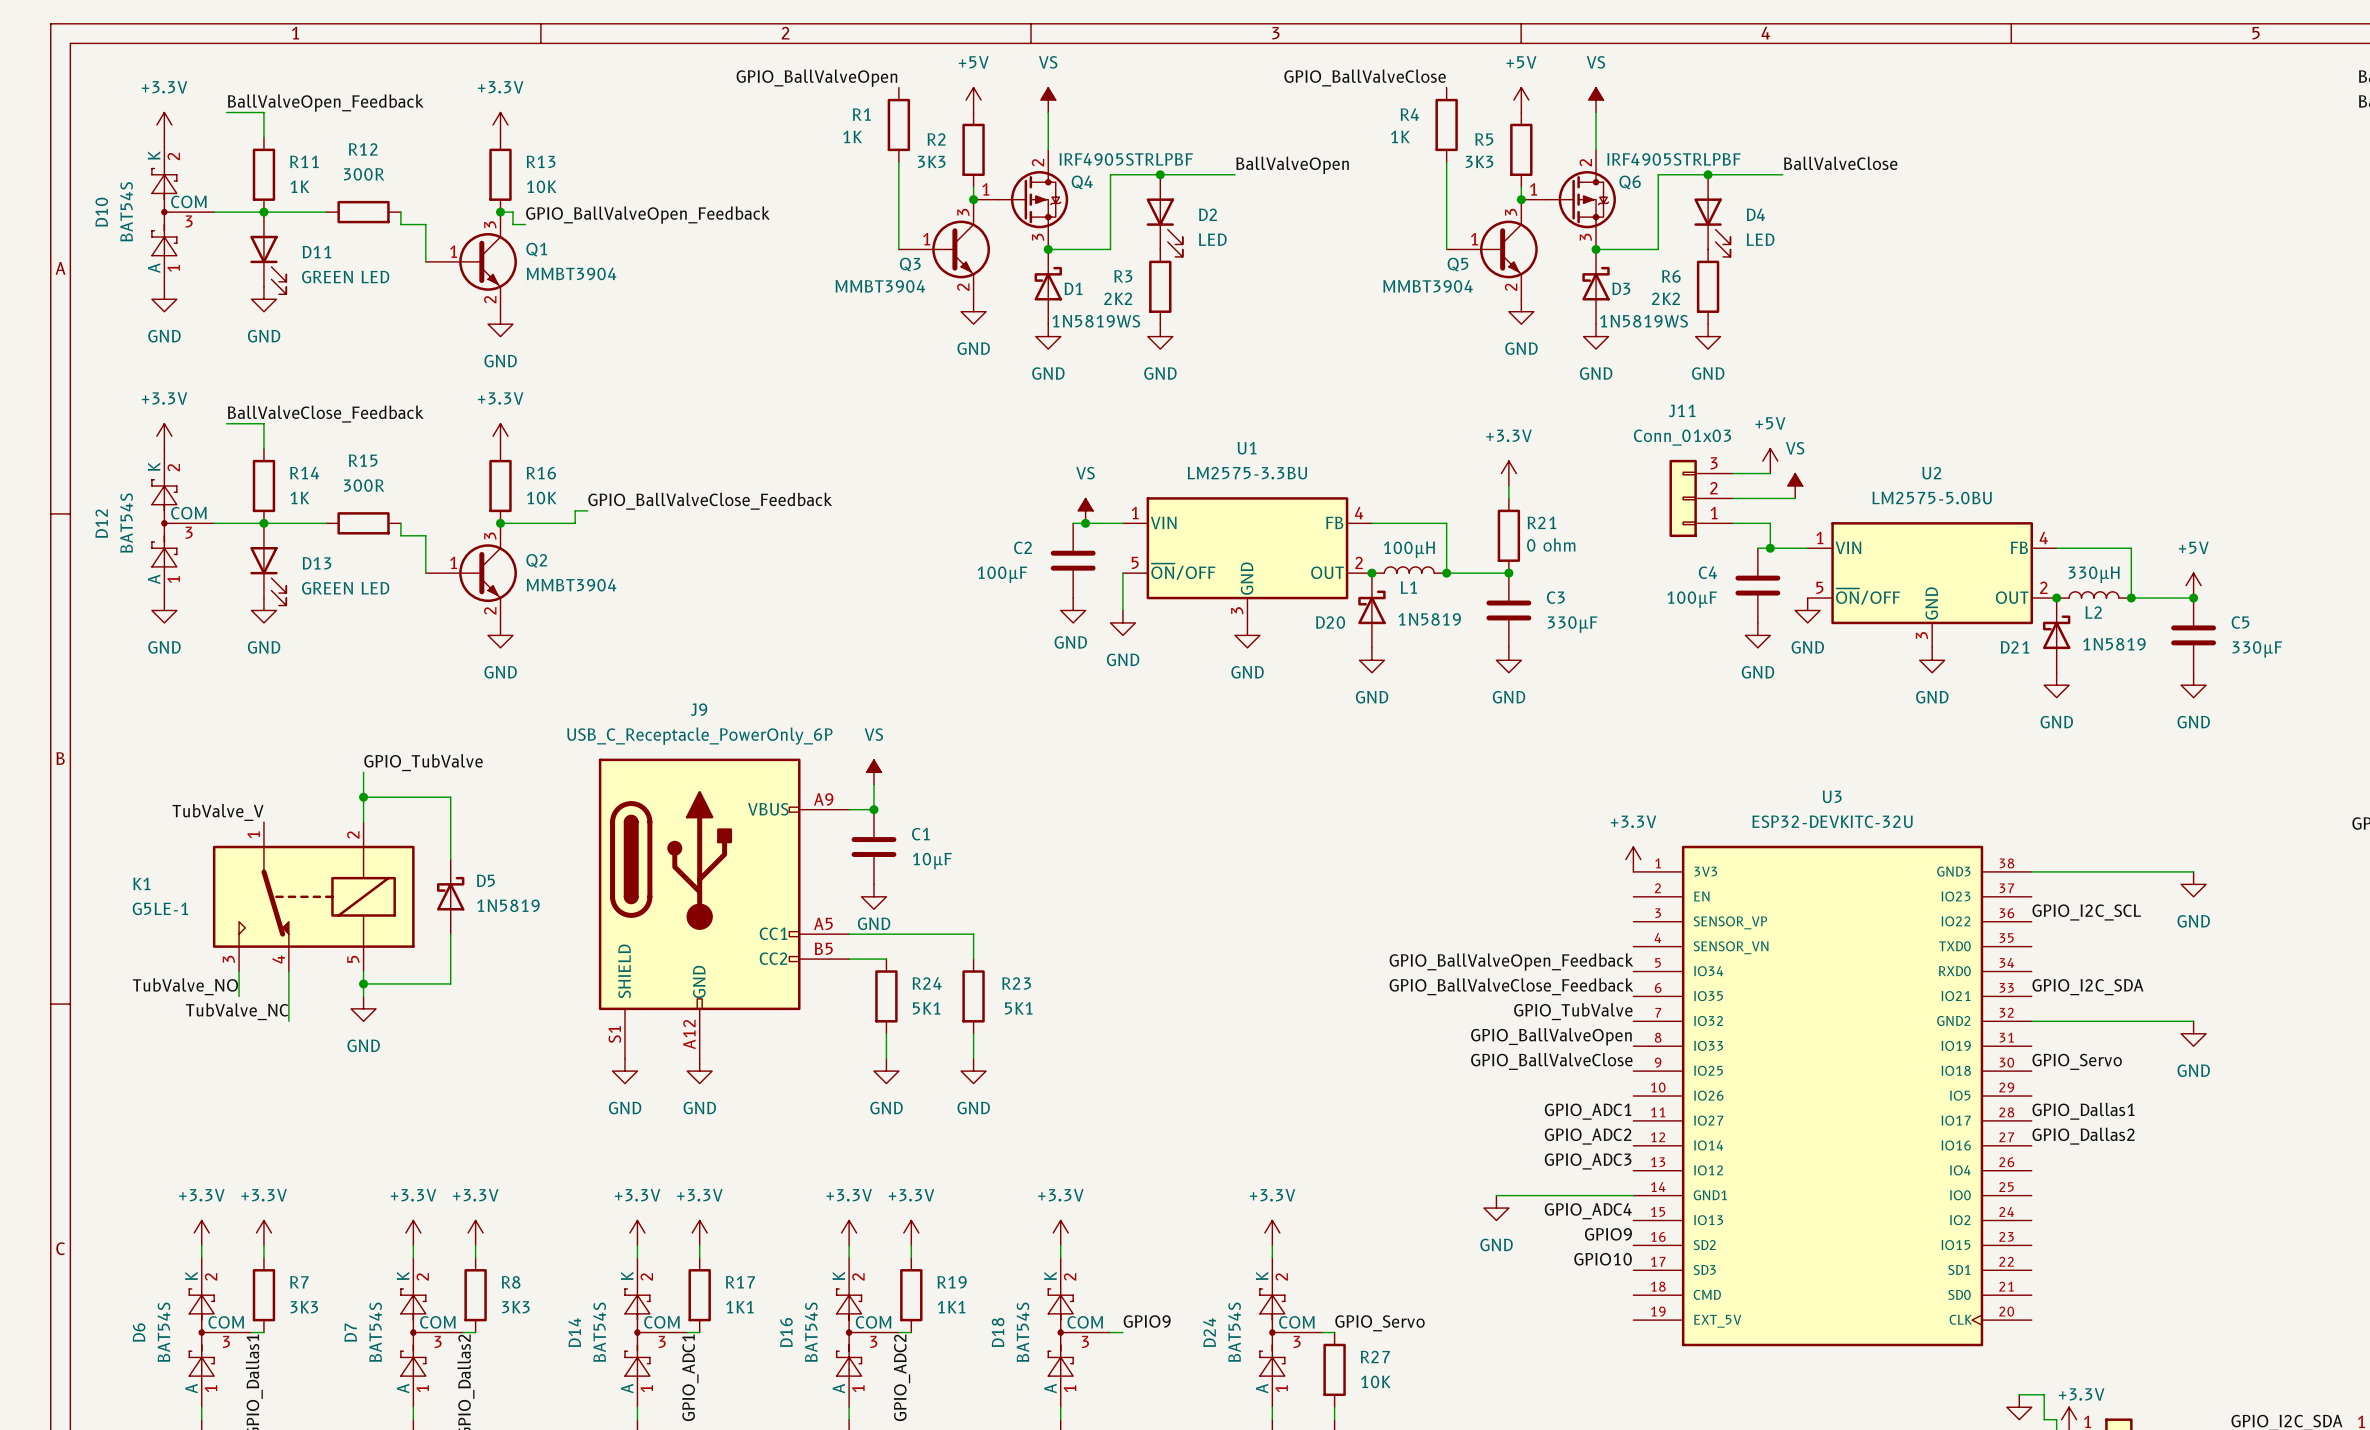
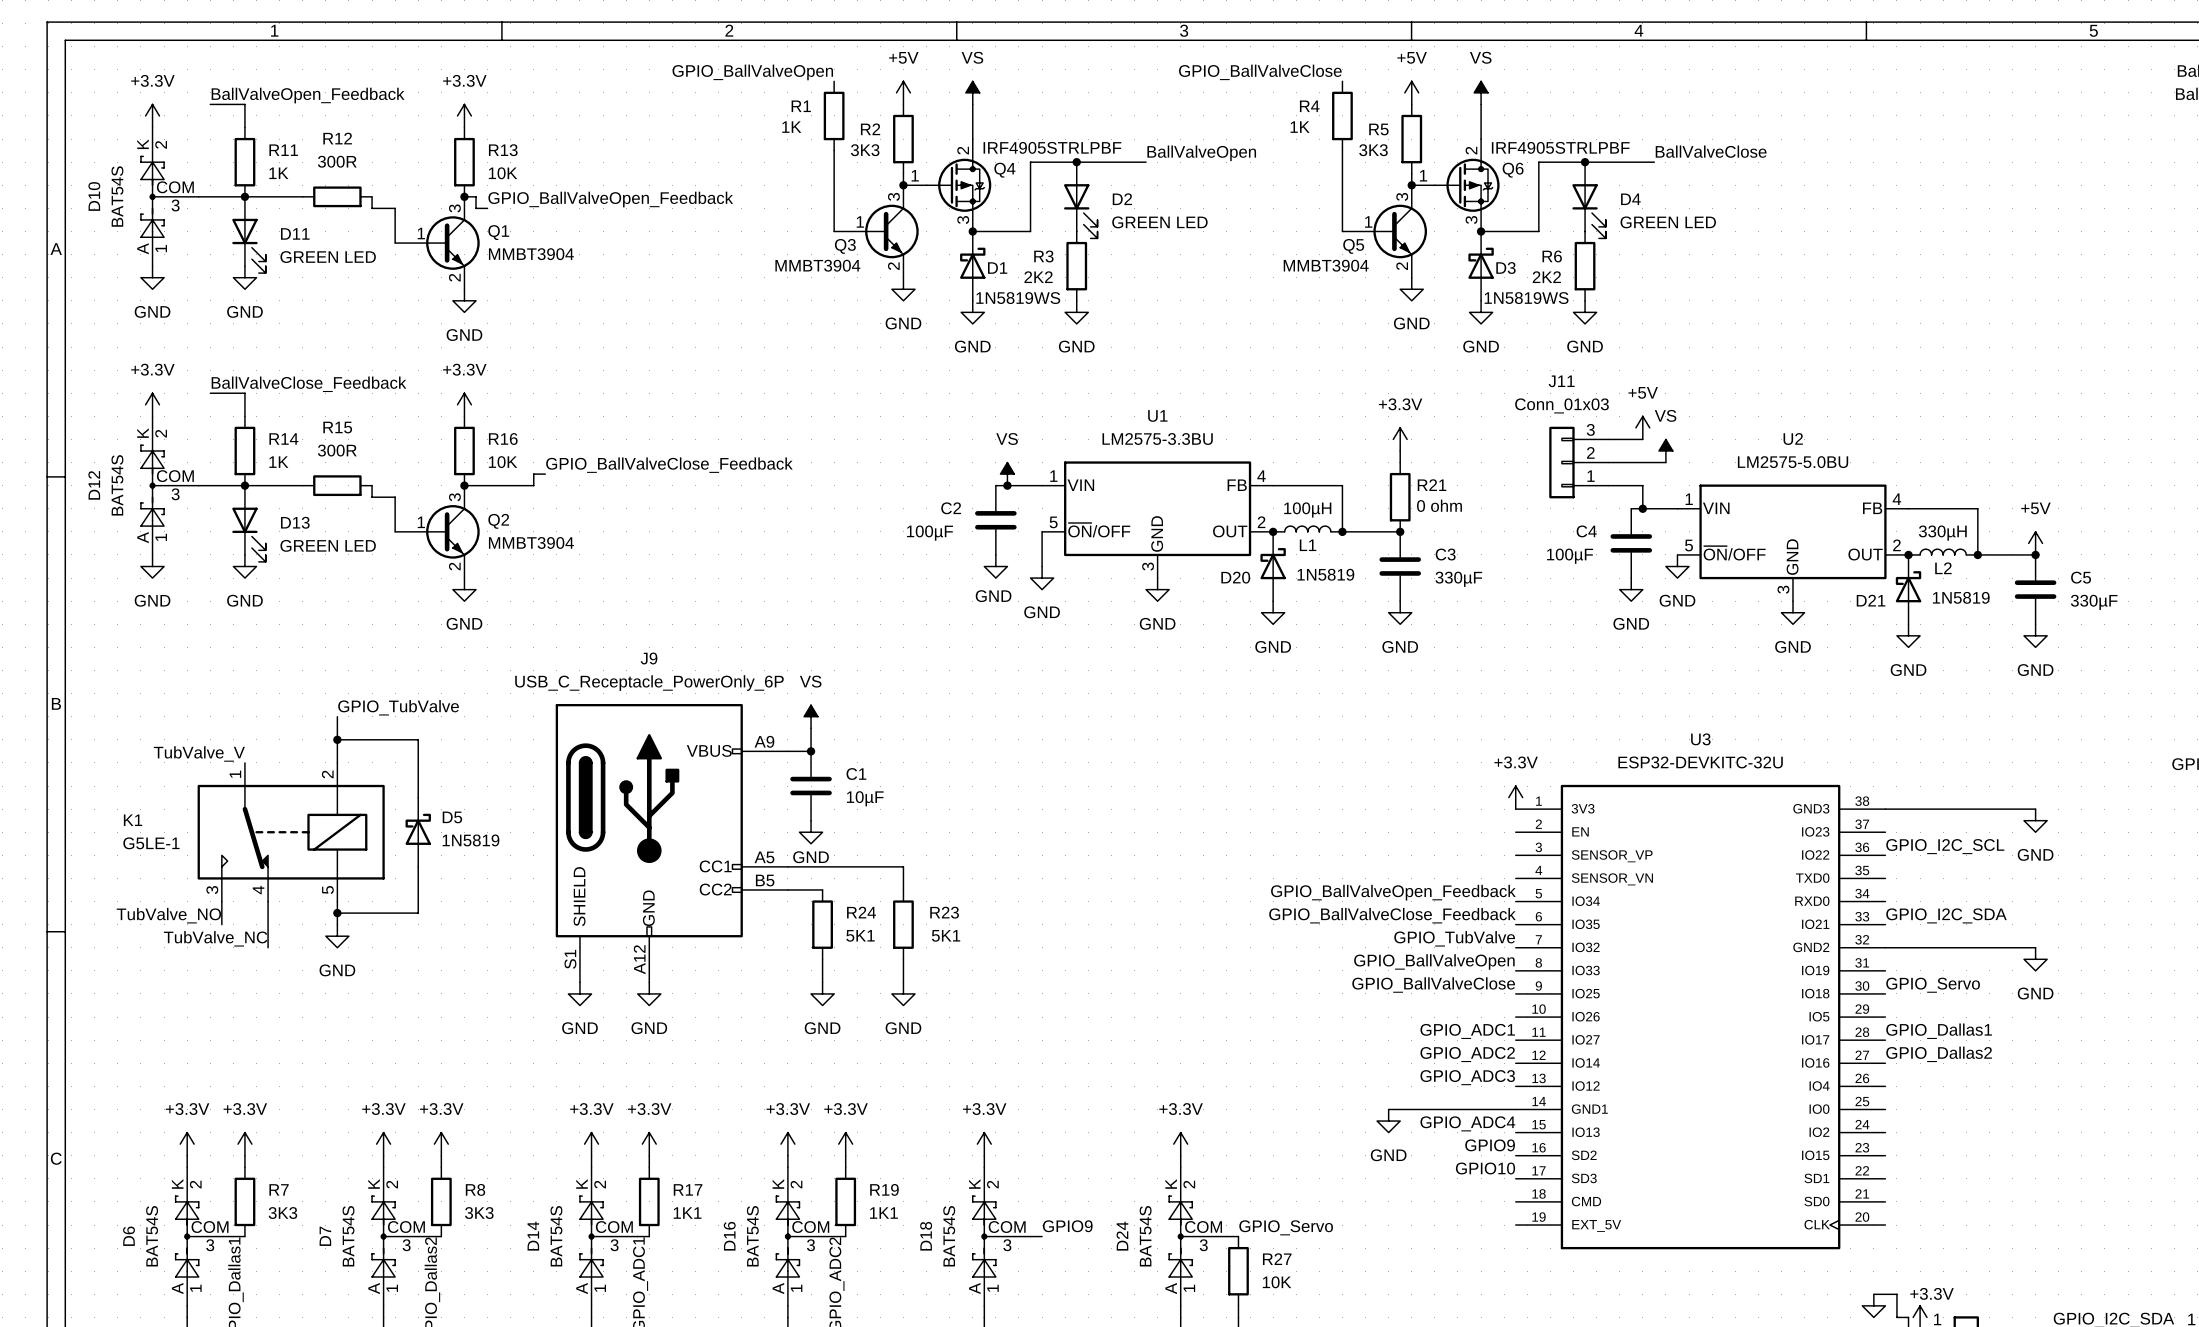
D2 value: LED (1212, 239) -> GREEN LED (1159, 222)
D4 value: LED (1760, 239) -> GREEN LED (1668, 222)

